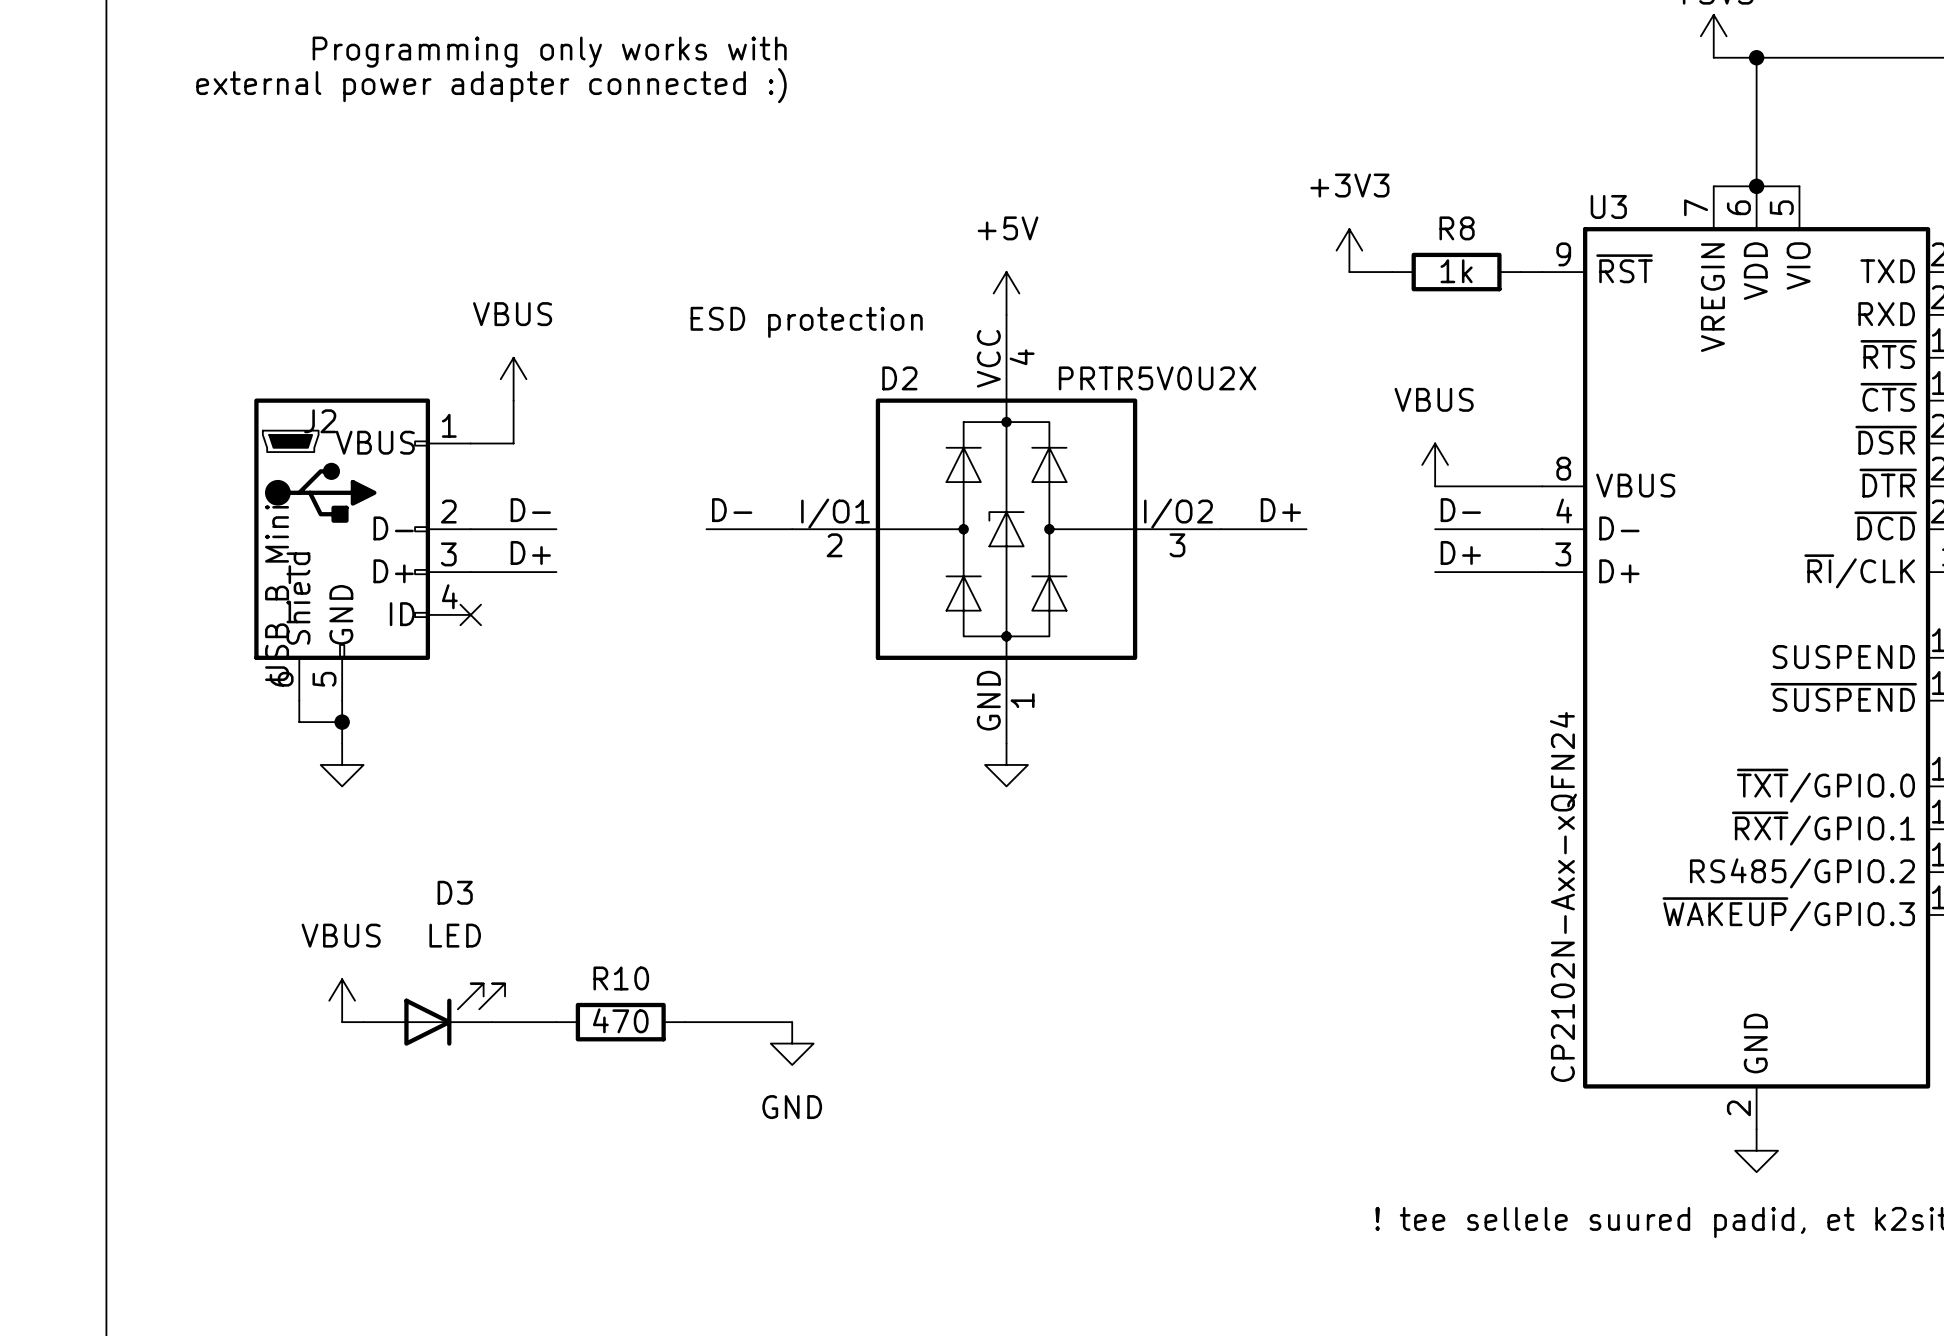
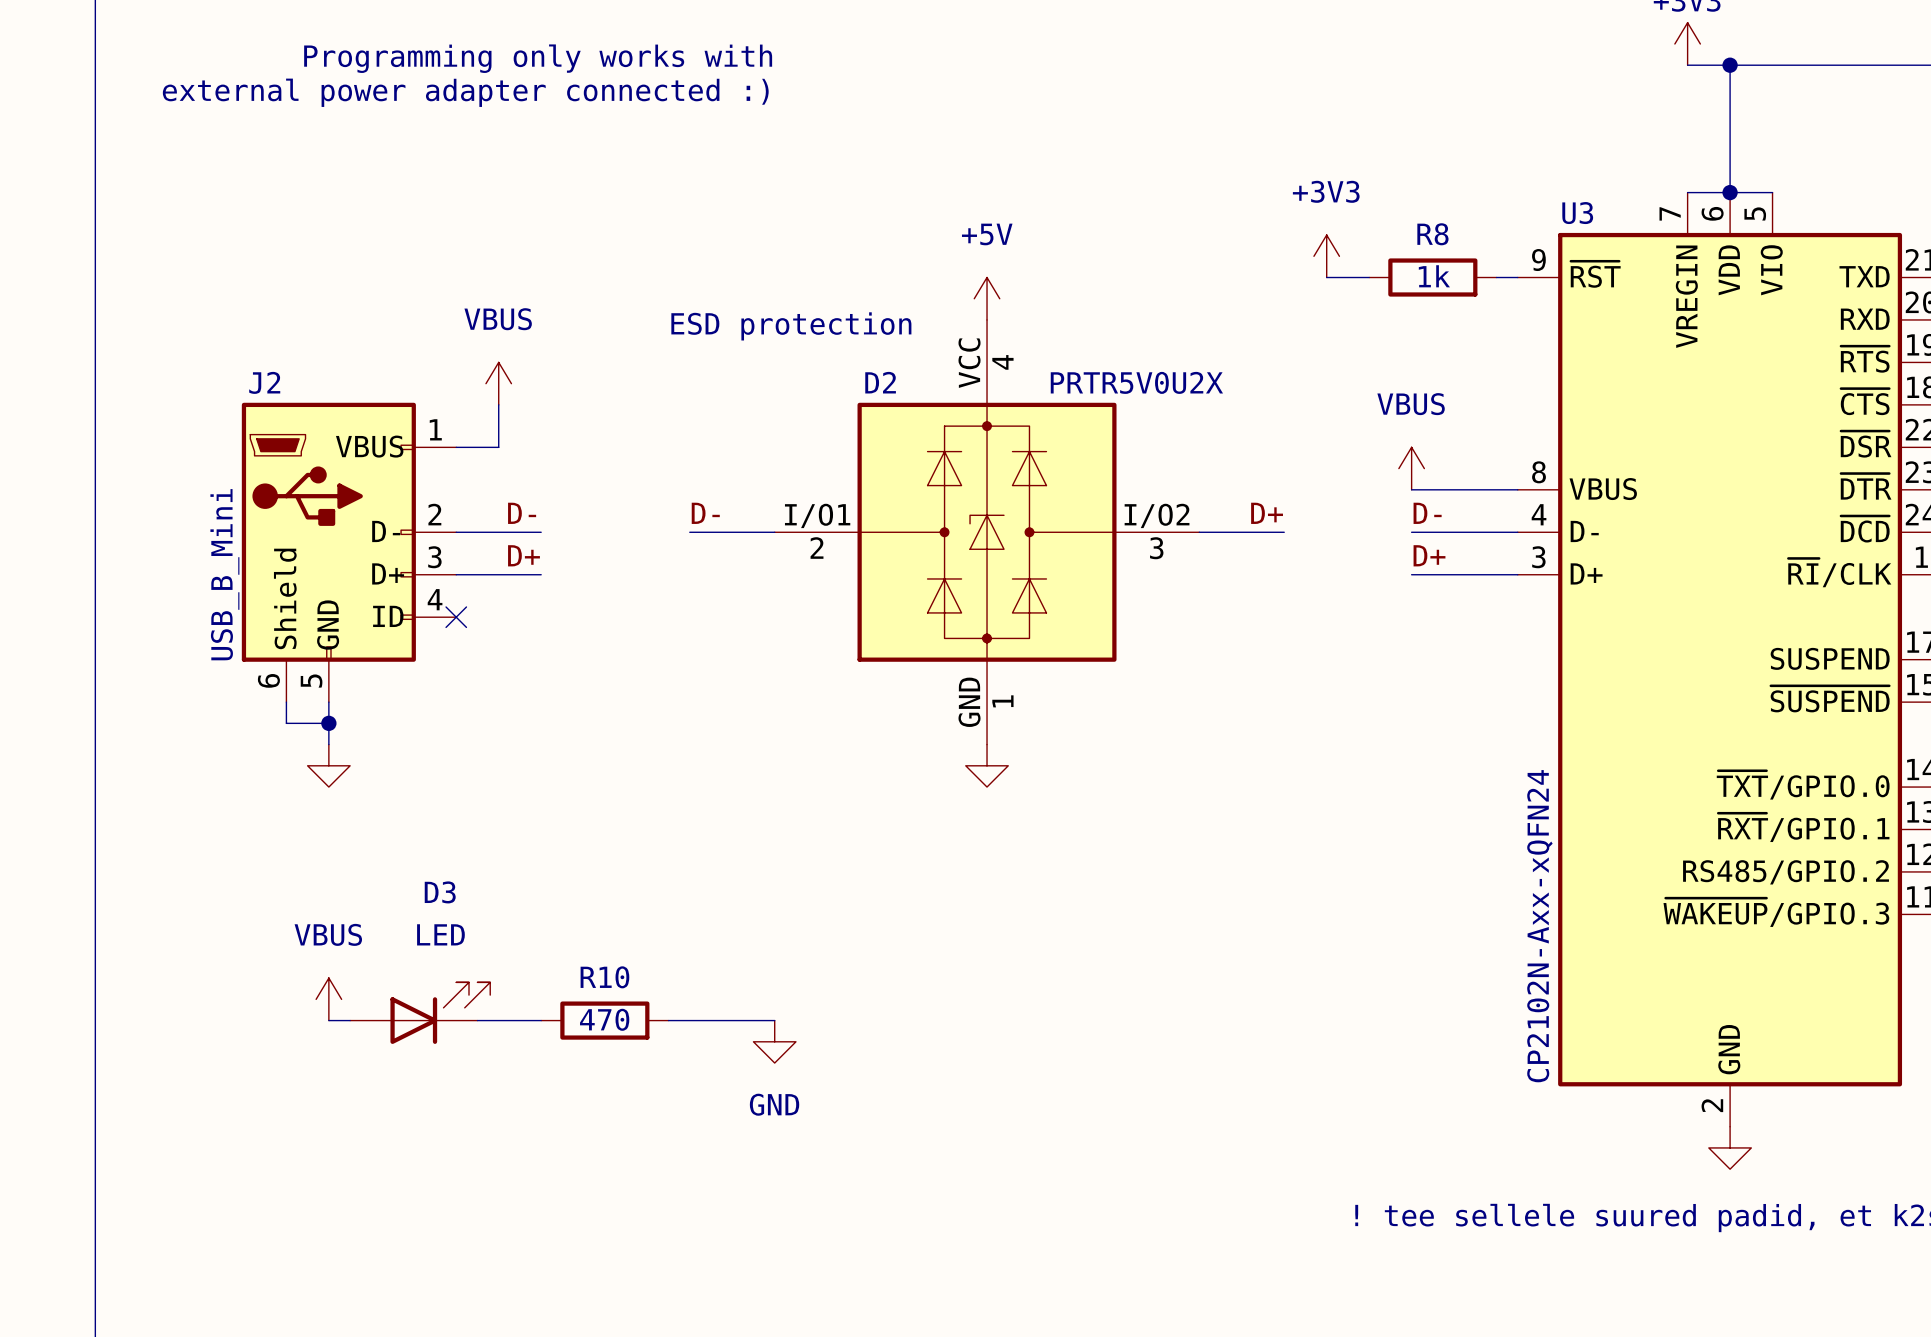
J2 name position: J2 (320, 421) -> J2 (264, 382)
J2 value position: USB_B_Mini (278, 593) -> USB_B_Mini (224, 574)

